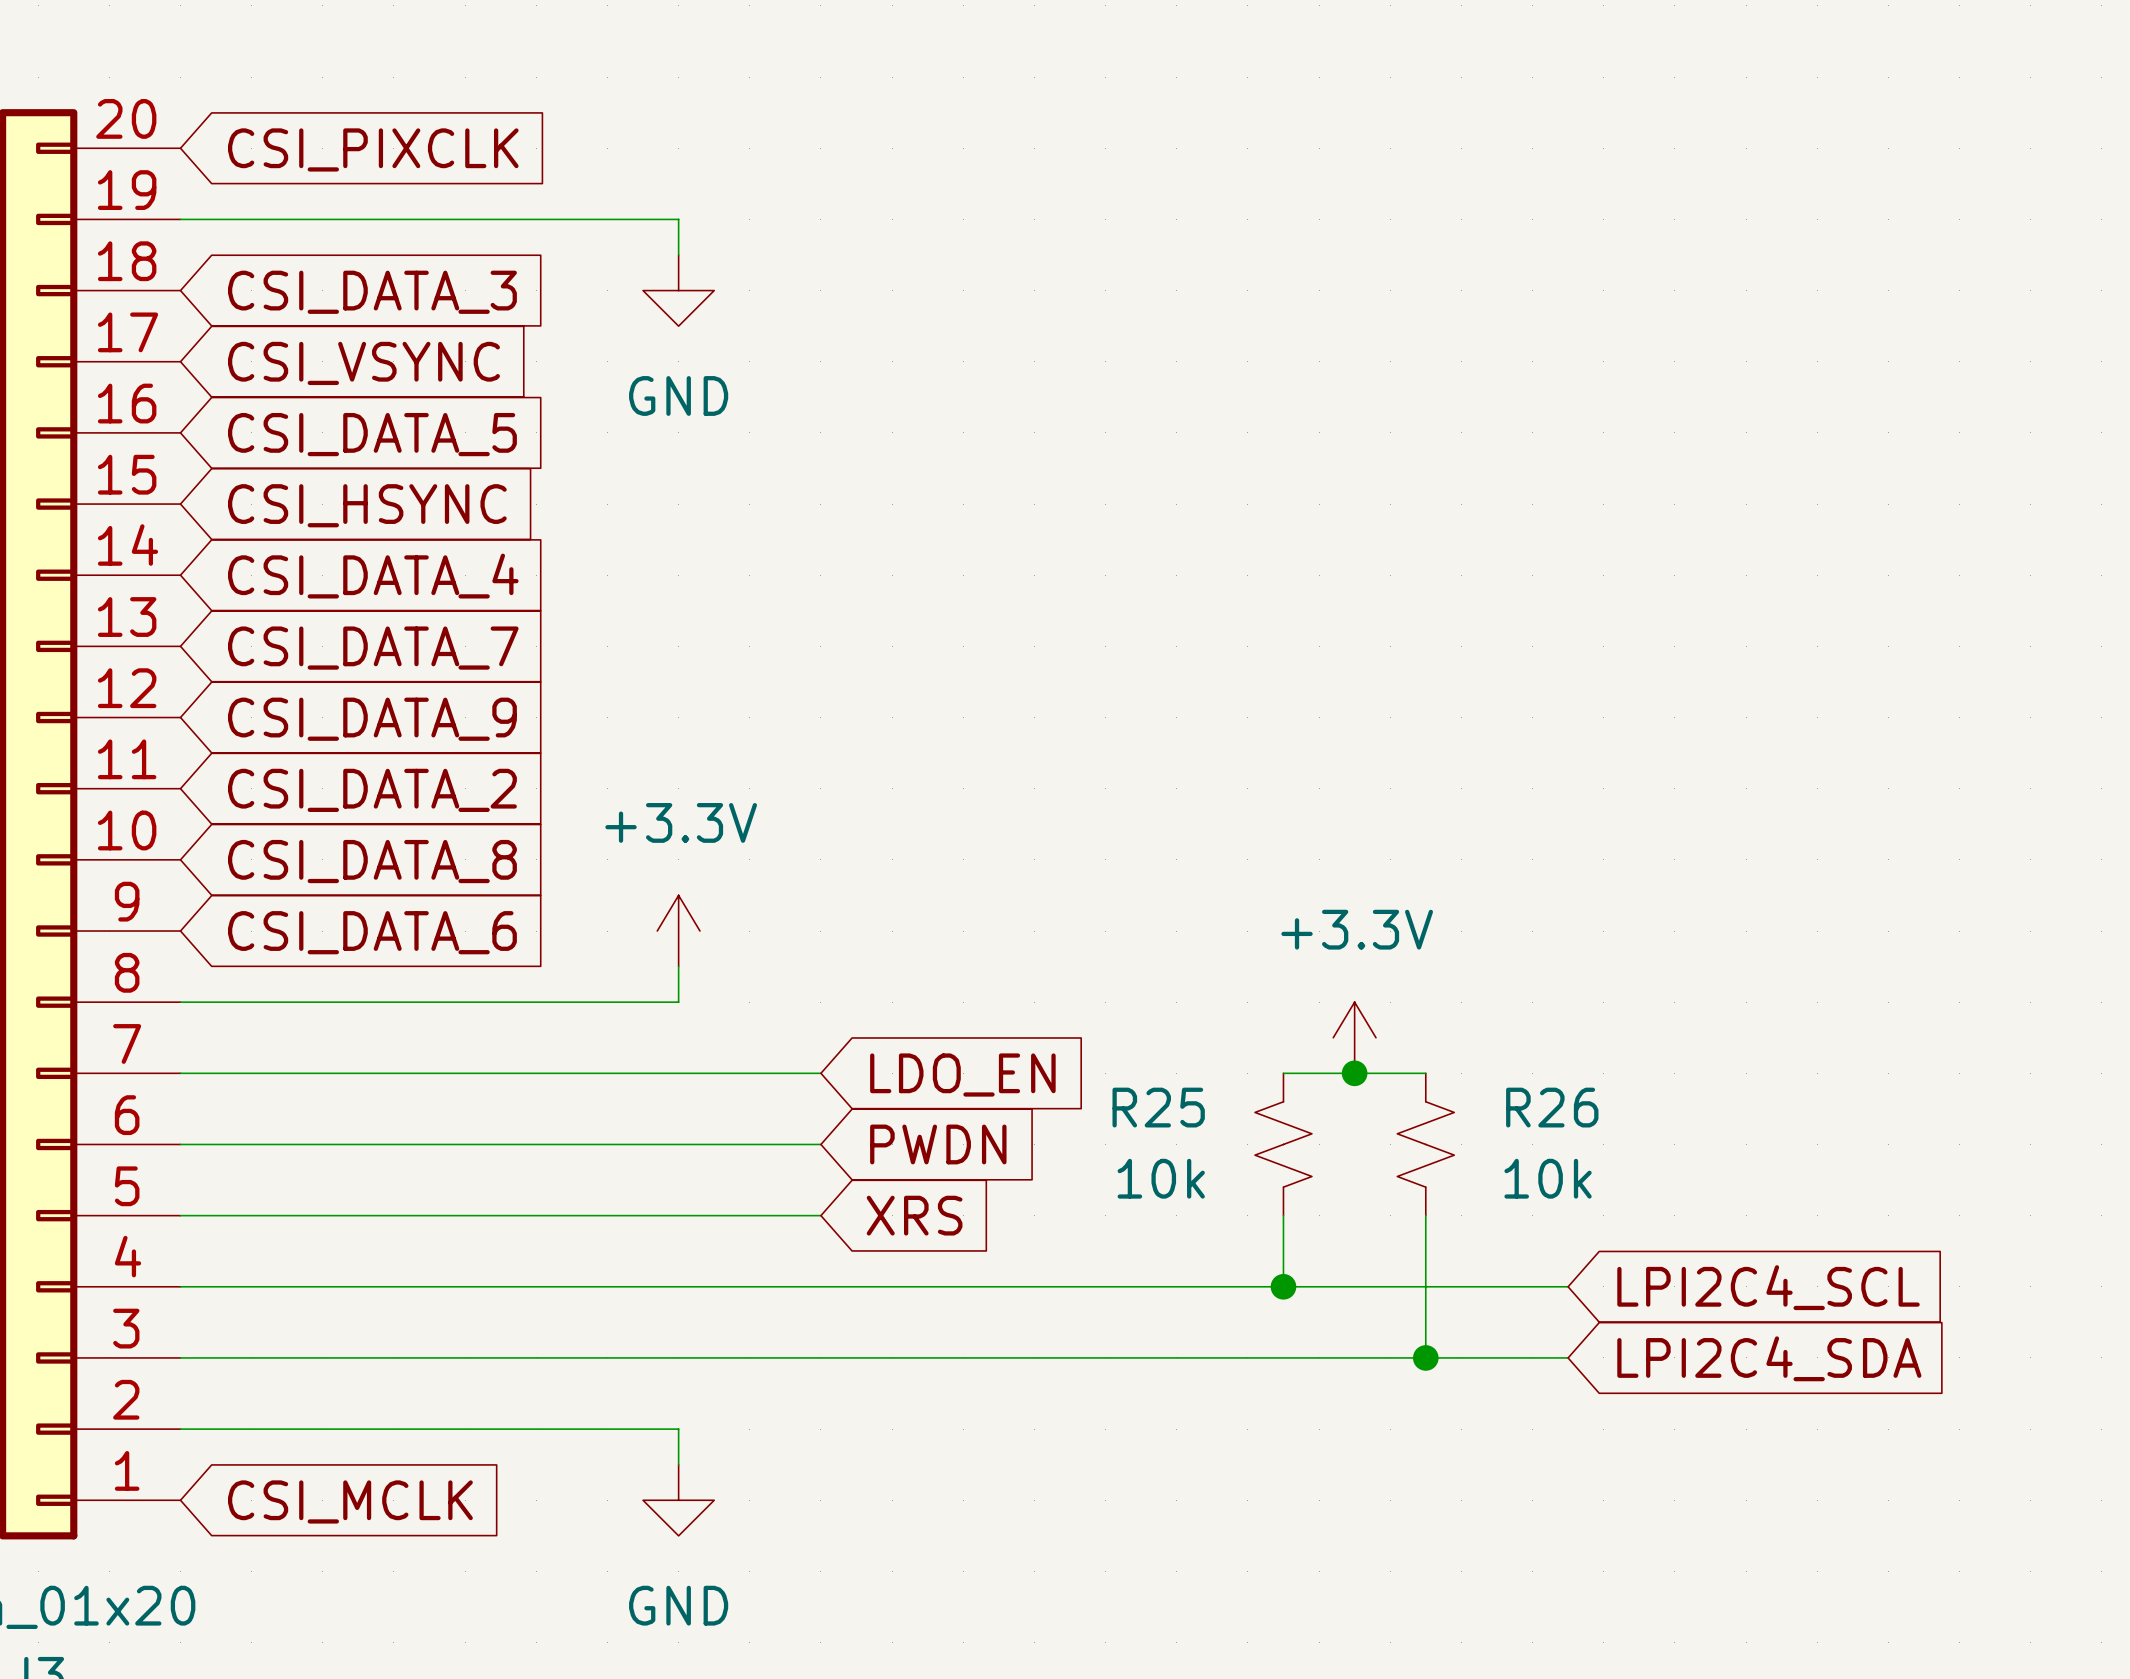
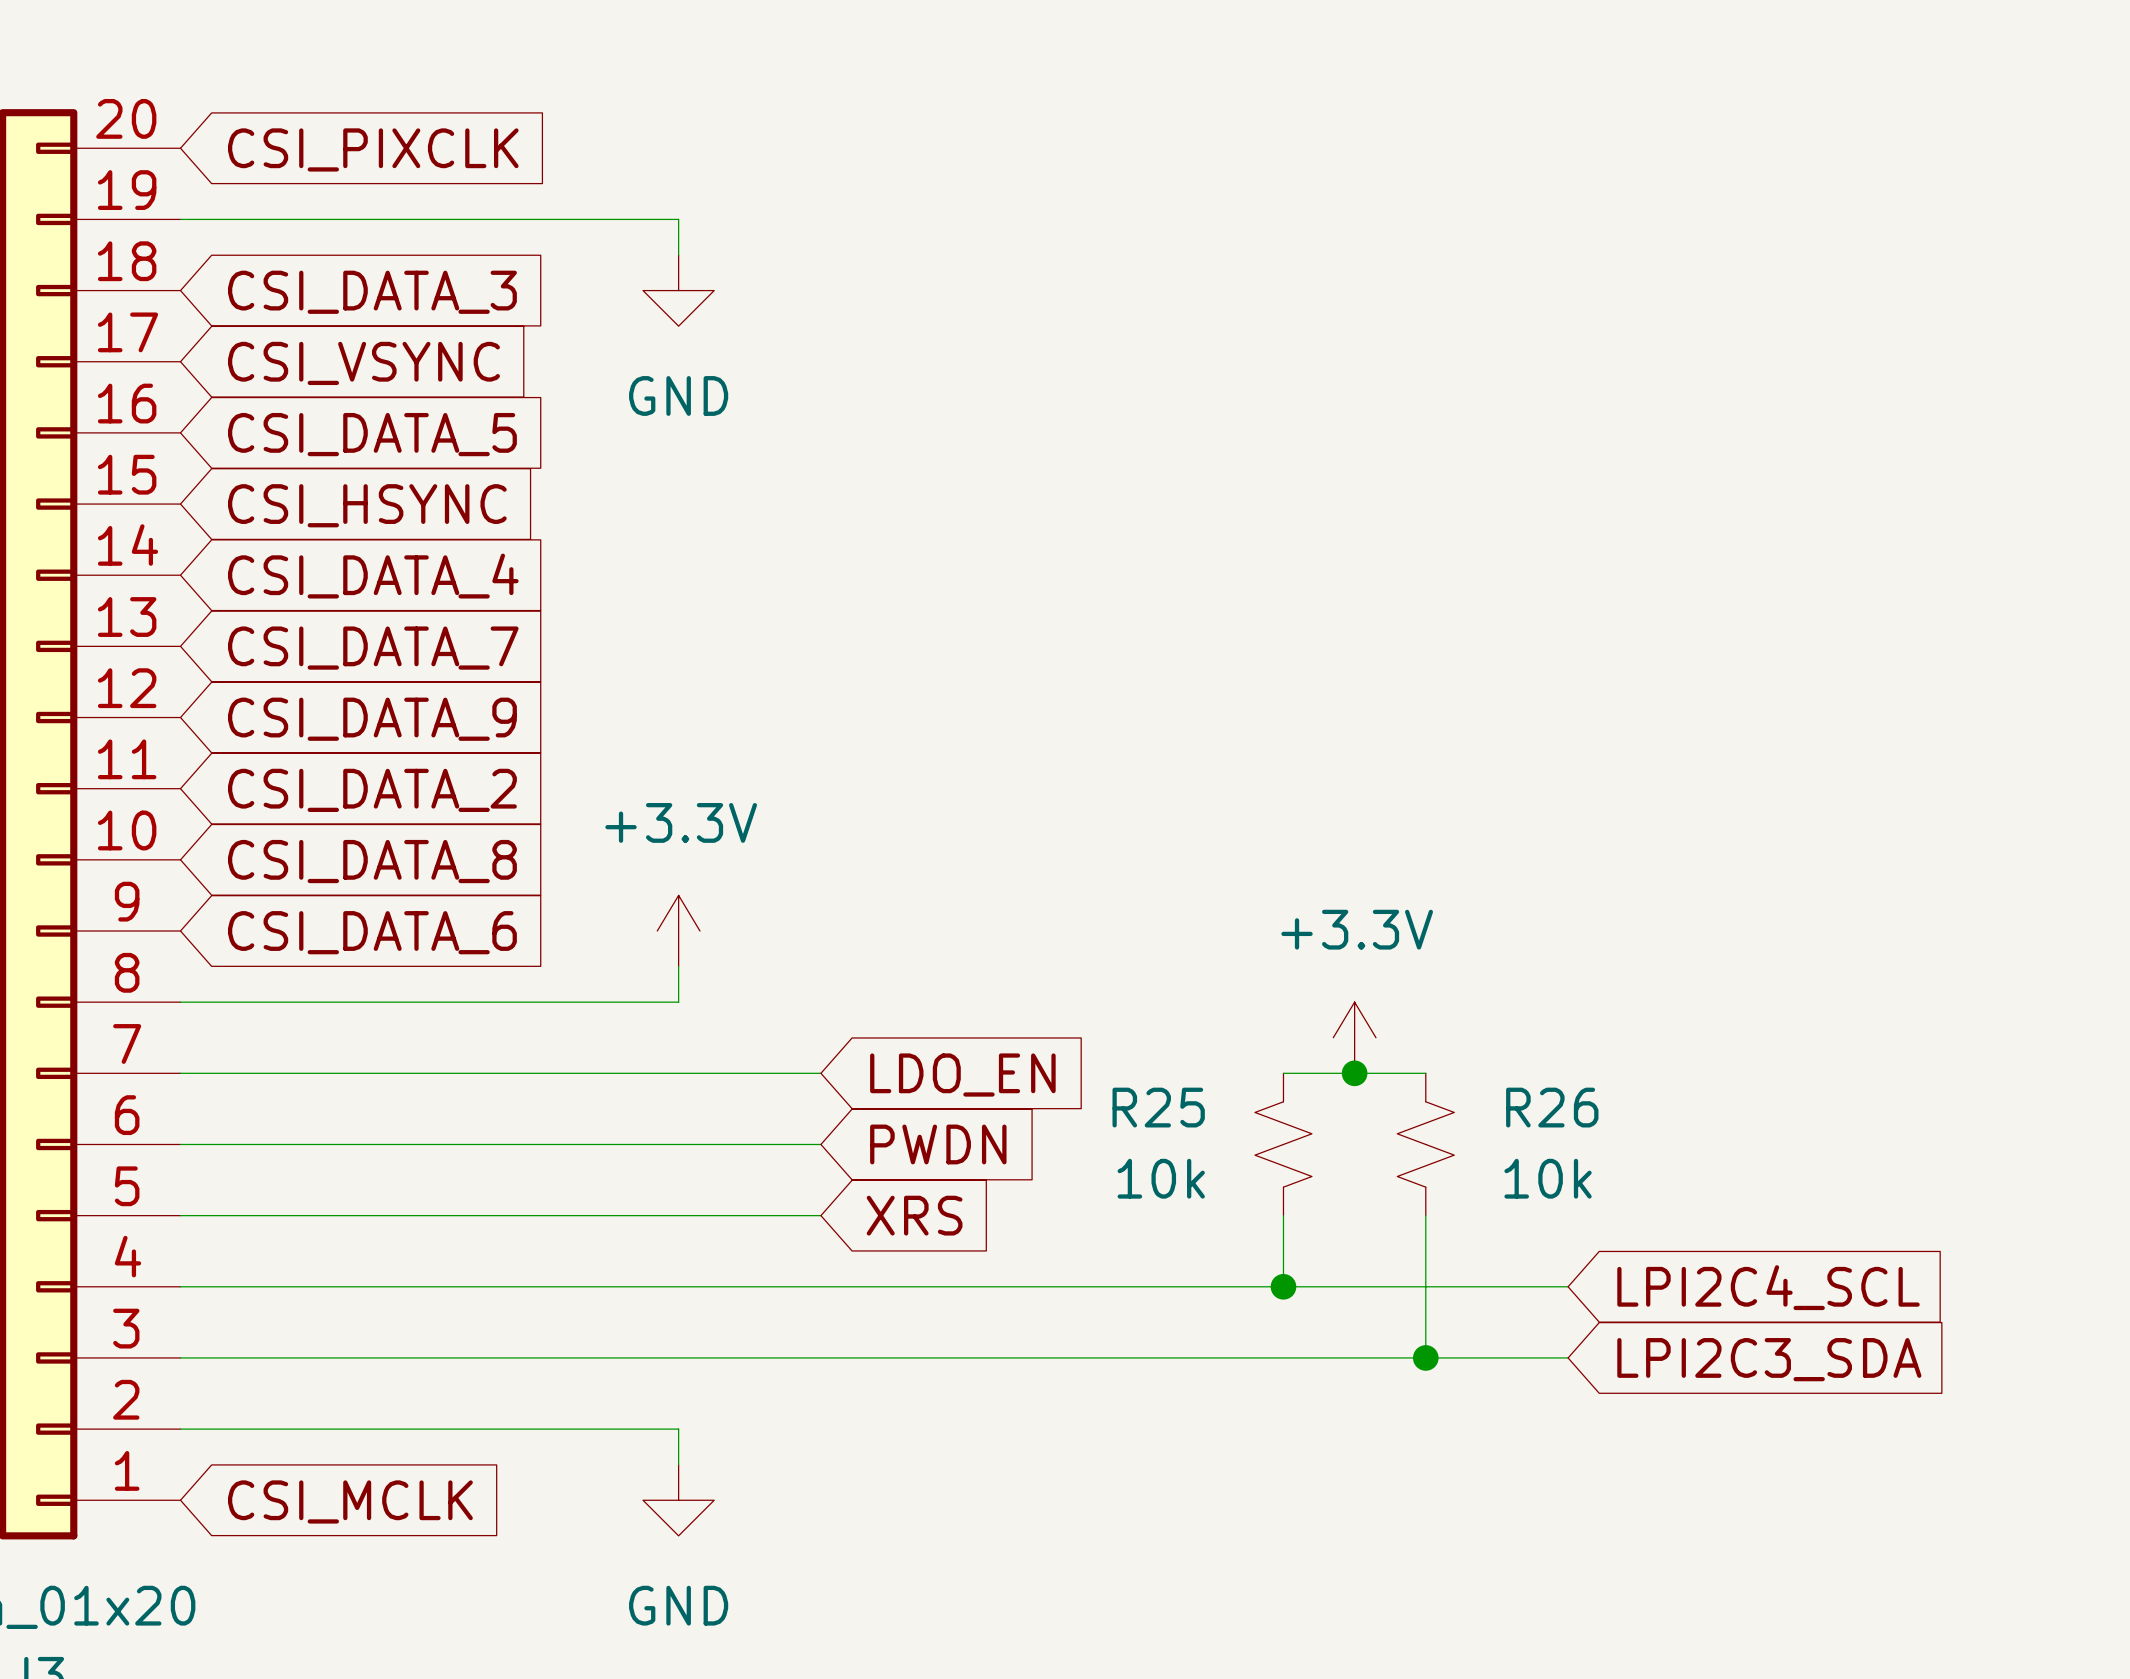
global label: LPI2C4_SDA (1769, 1358) -> LPI2C3_SDA (1769, 1359)

